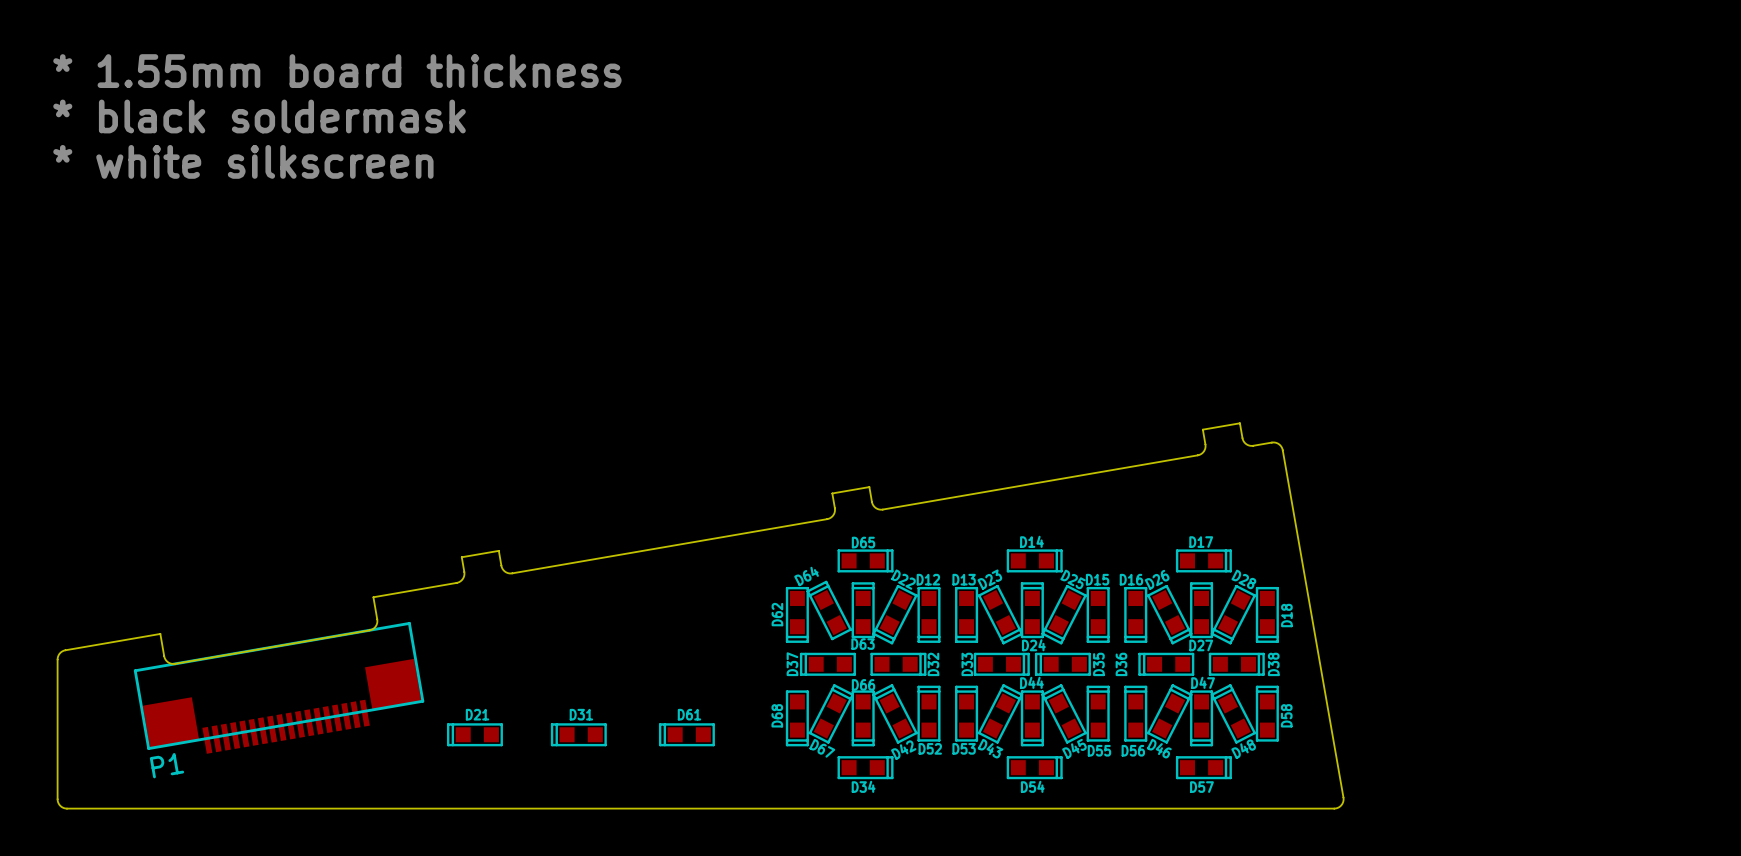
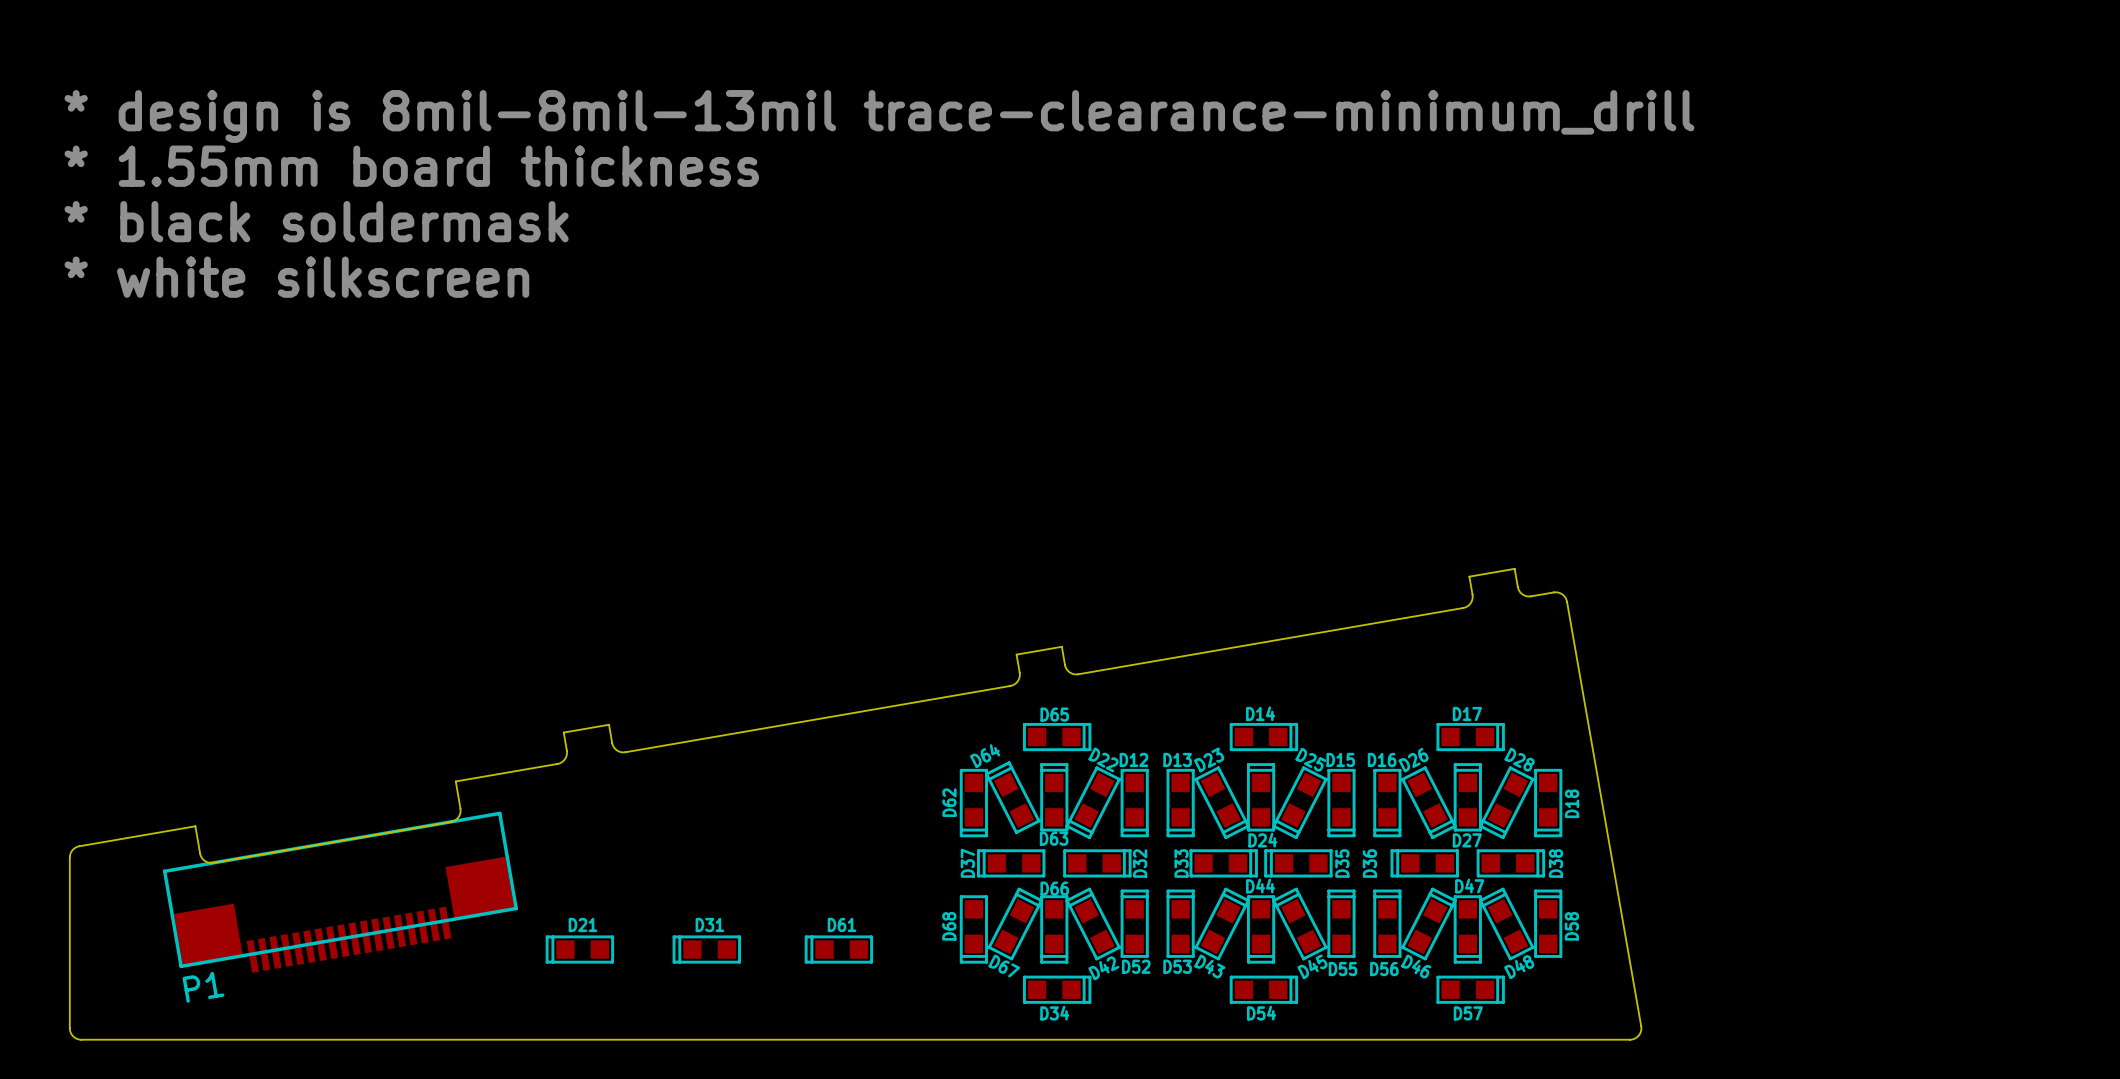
text: none -> * design is 8mil-8mil-13mil trace-clearance-minimum_drill (879, 116)
text position: * 1.55mm board thickness (337, 71) -> * 1.55mm board thickness (411, 166)
text position: * black soldermask (259, 116) -> * black soldermask (316, 221)
text position: * white silkscreen (243, 161) -> * white silkscreen (296, 277)

